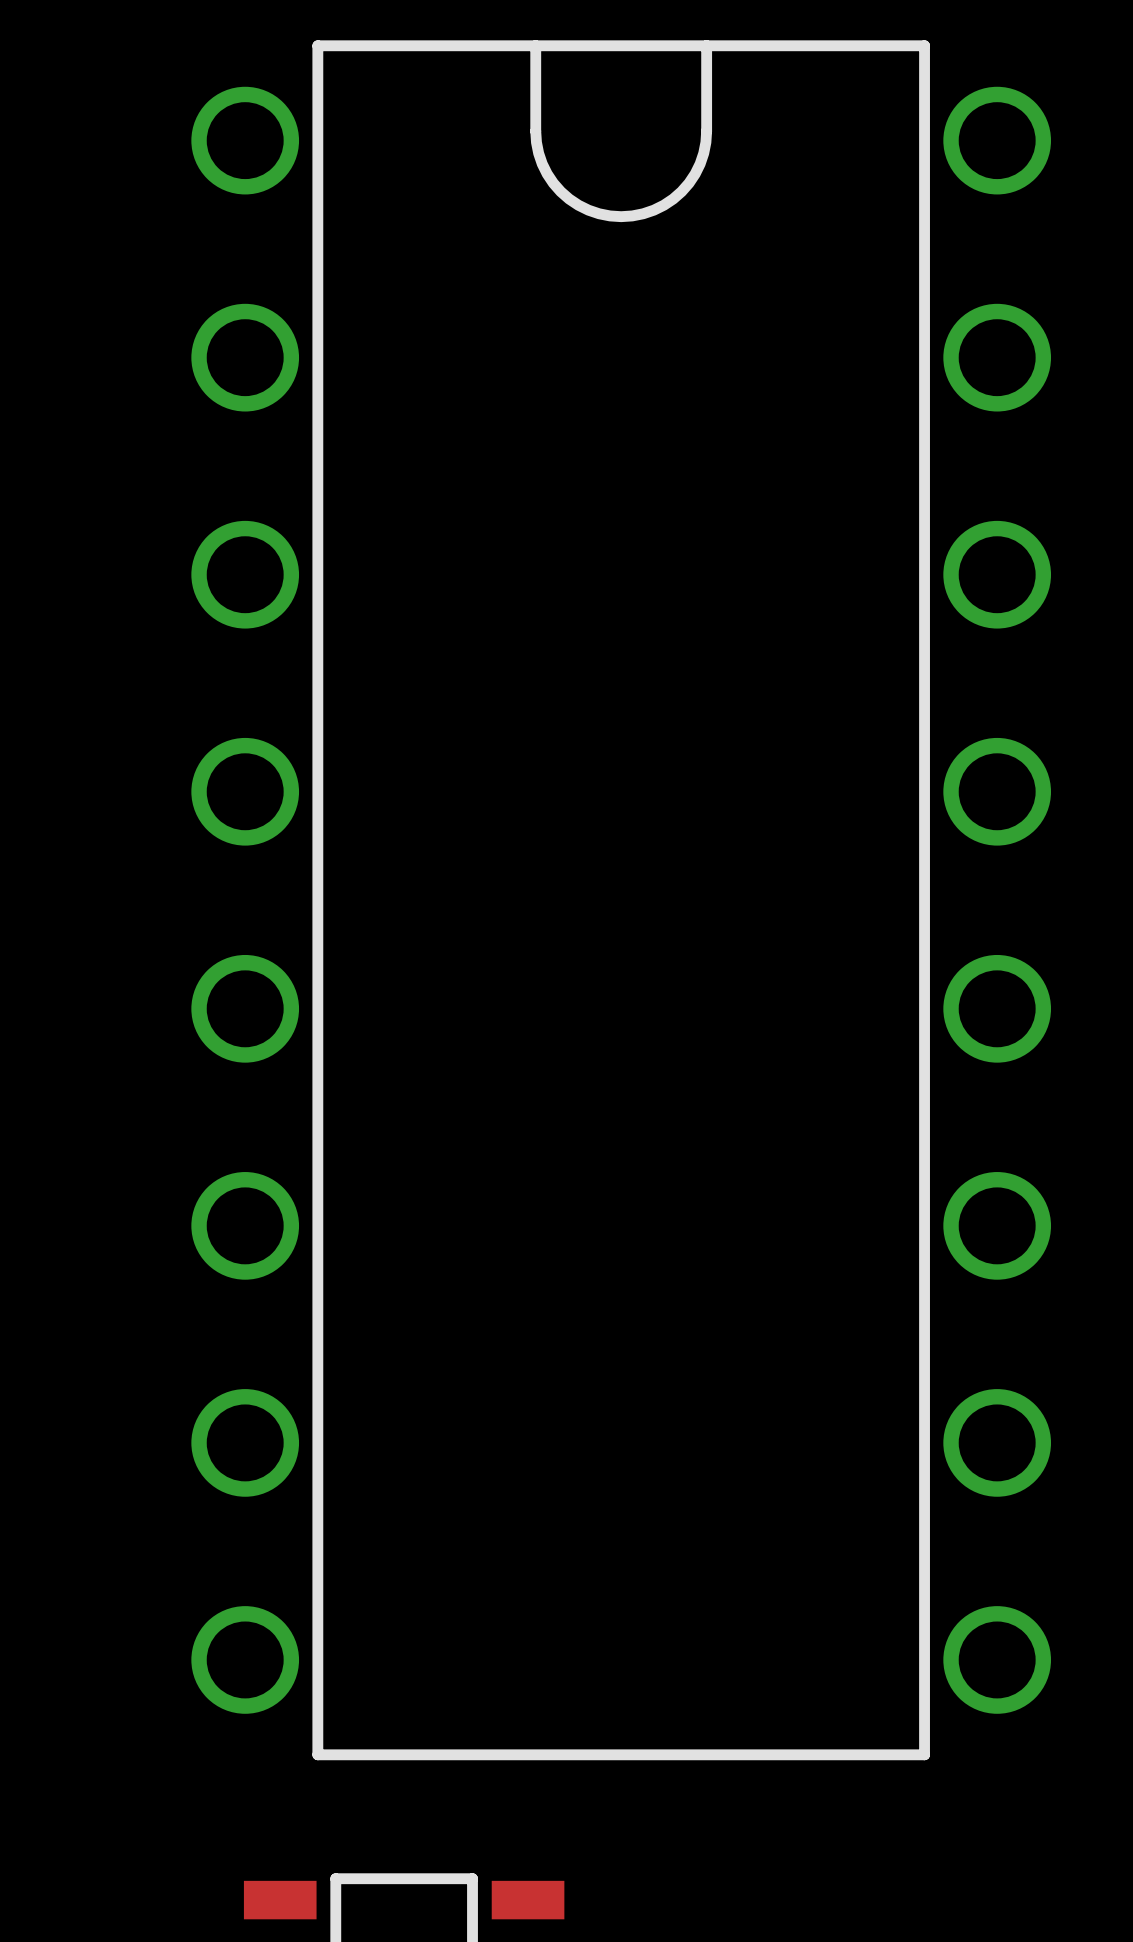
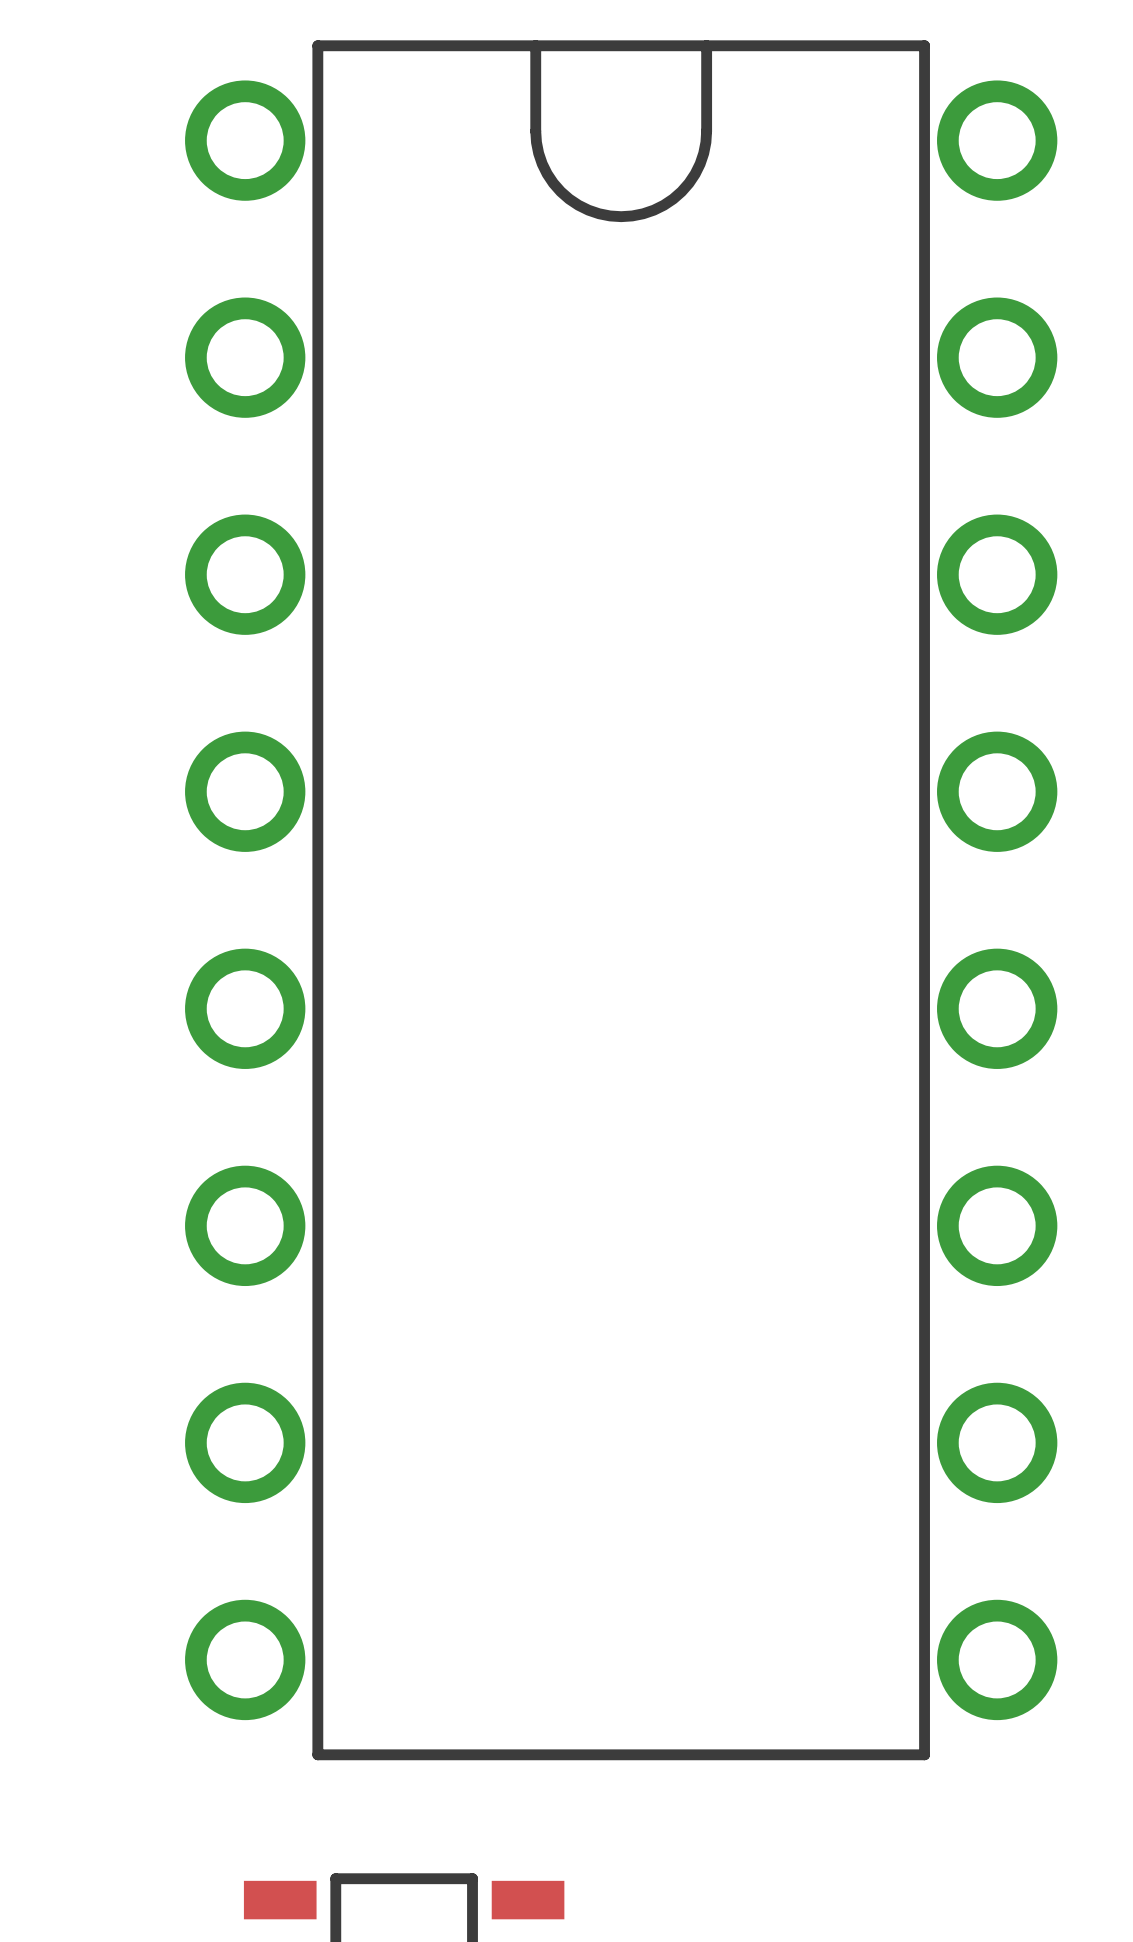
part footprint: [191, 40, 1052, 1761] -> [185, 40, 1058, 1761]

